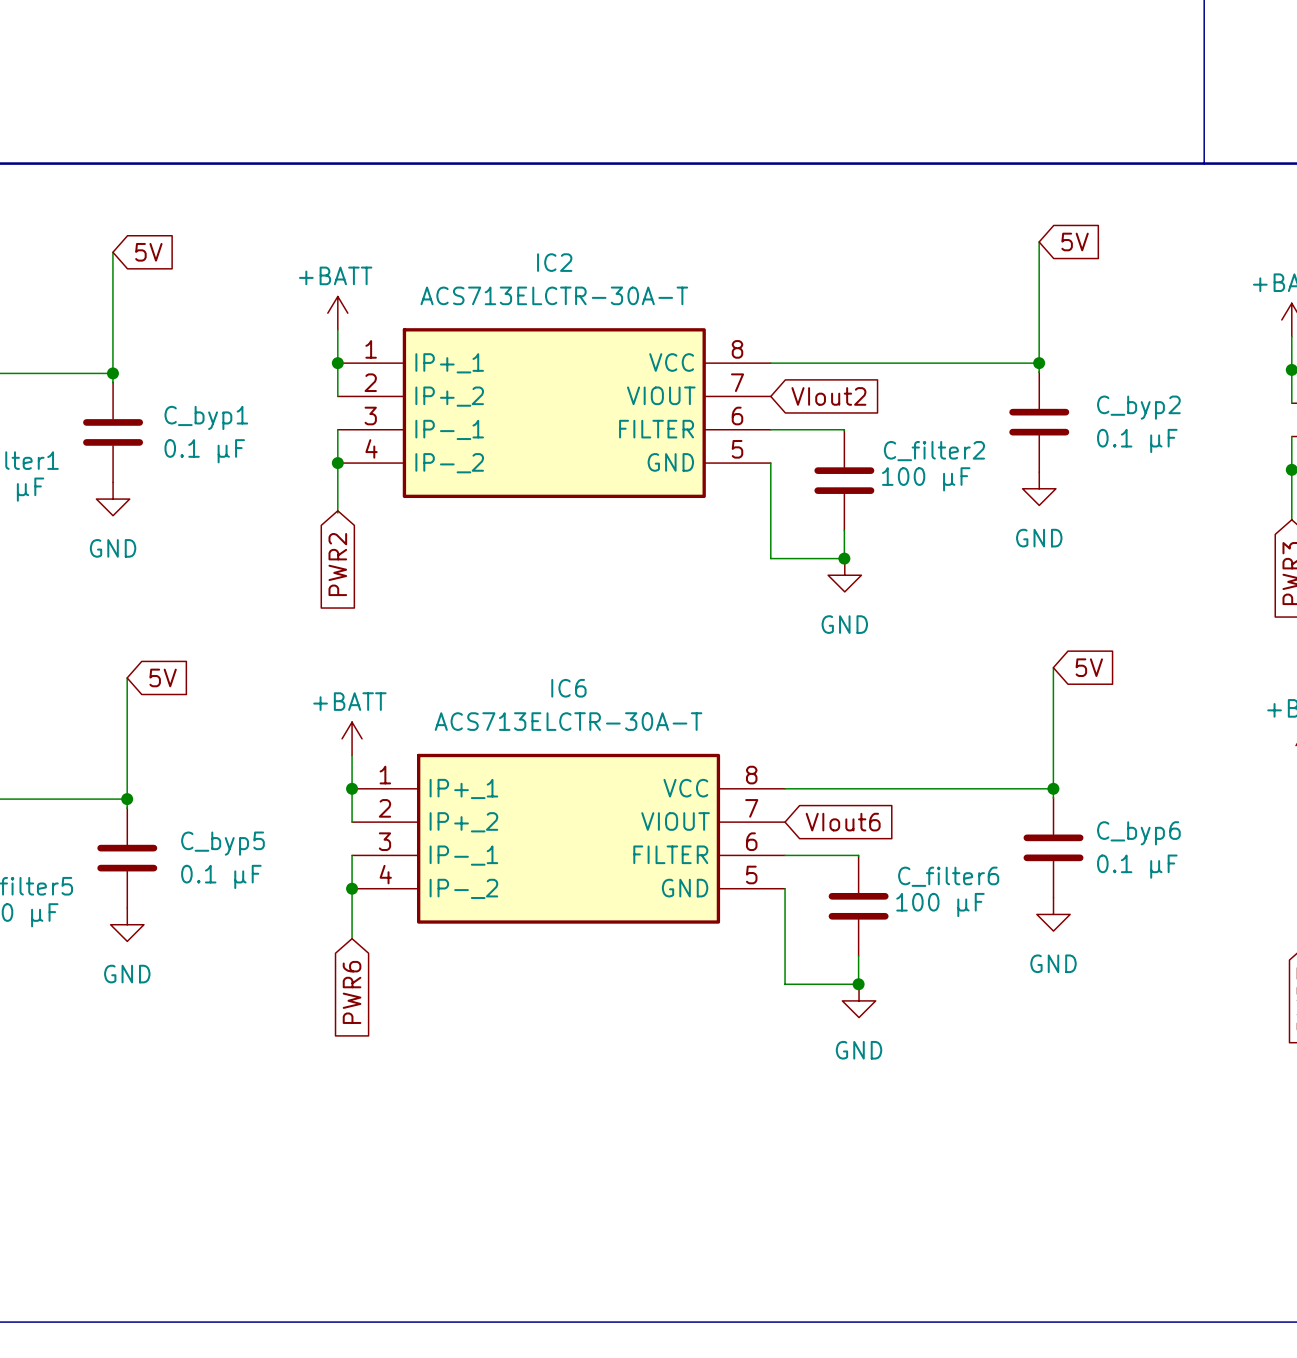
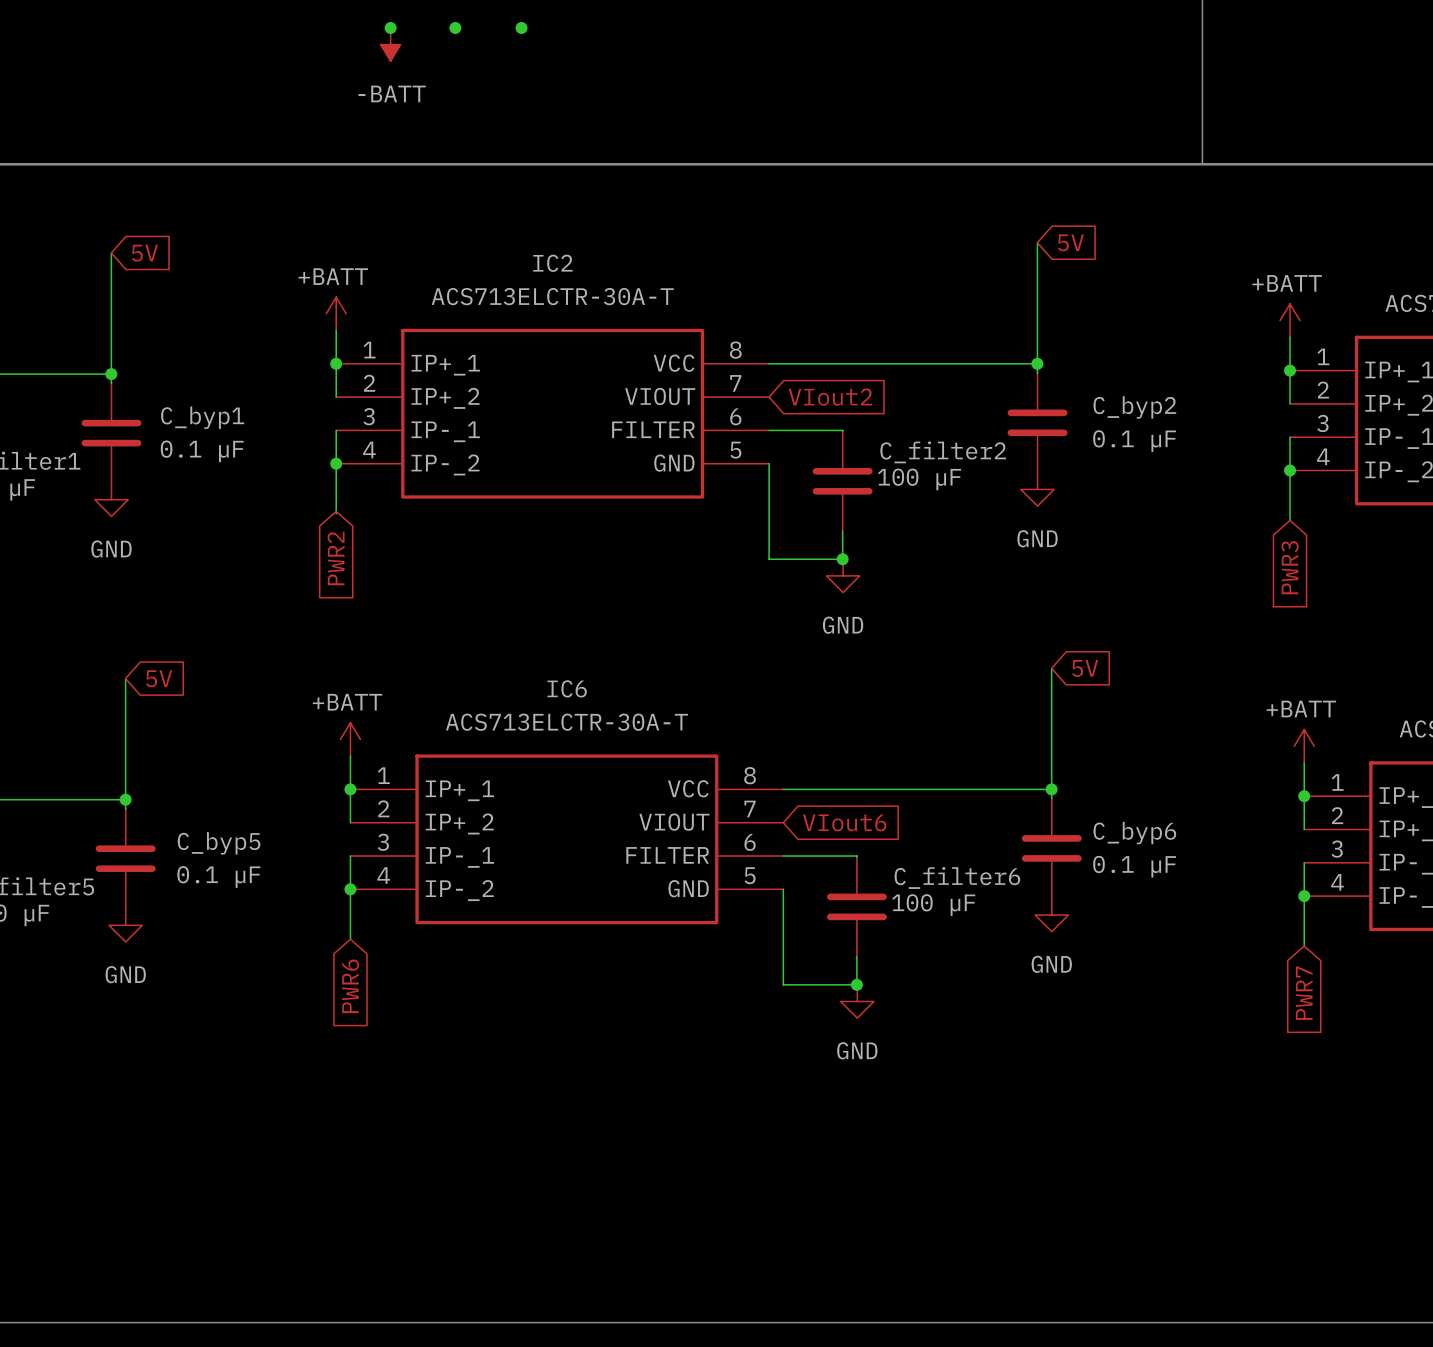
junction: none -> (390, 27)
junction: none -> (455, 27)
junction: none -> (521, 27)
power symbol: none -> -BATT (390, 44)

